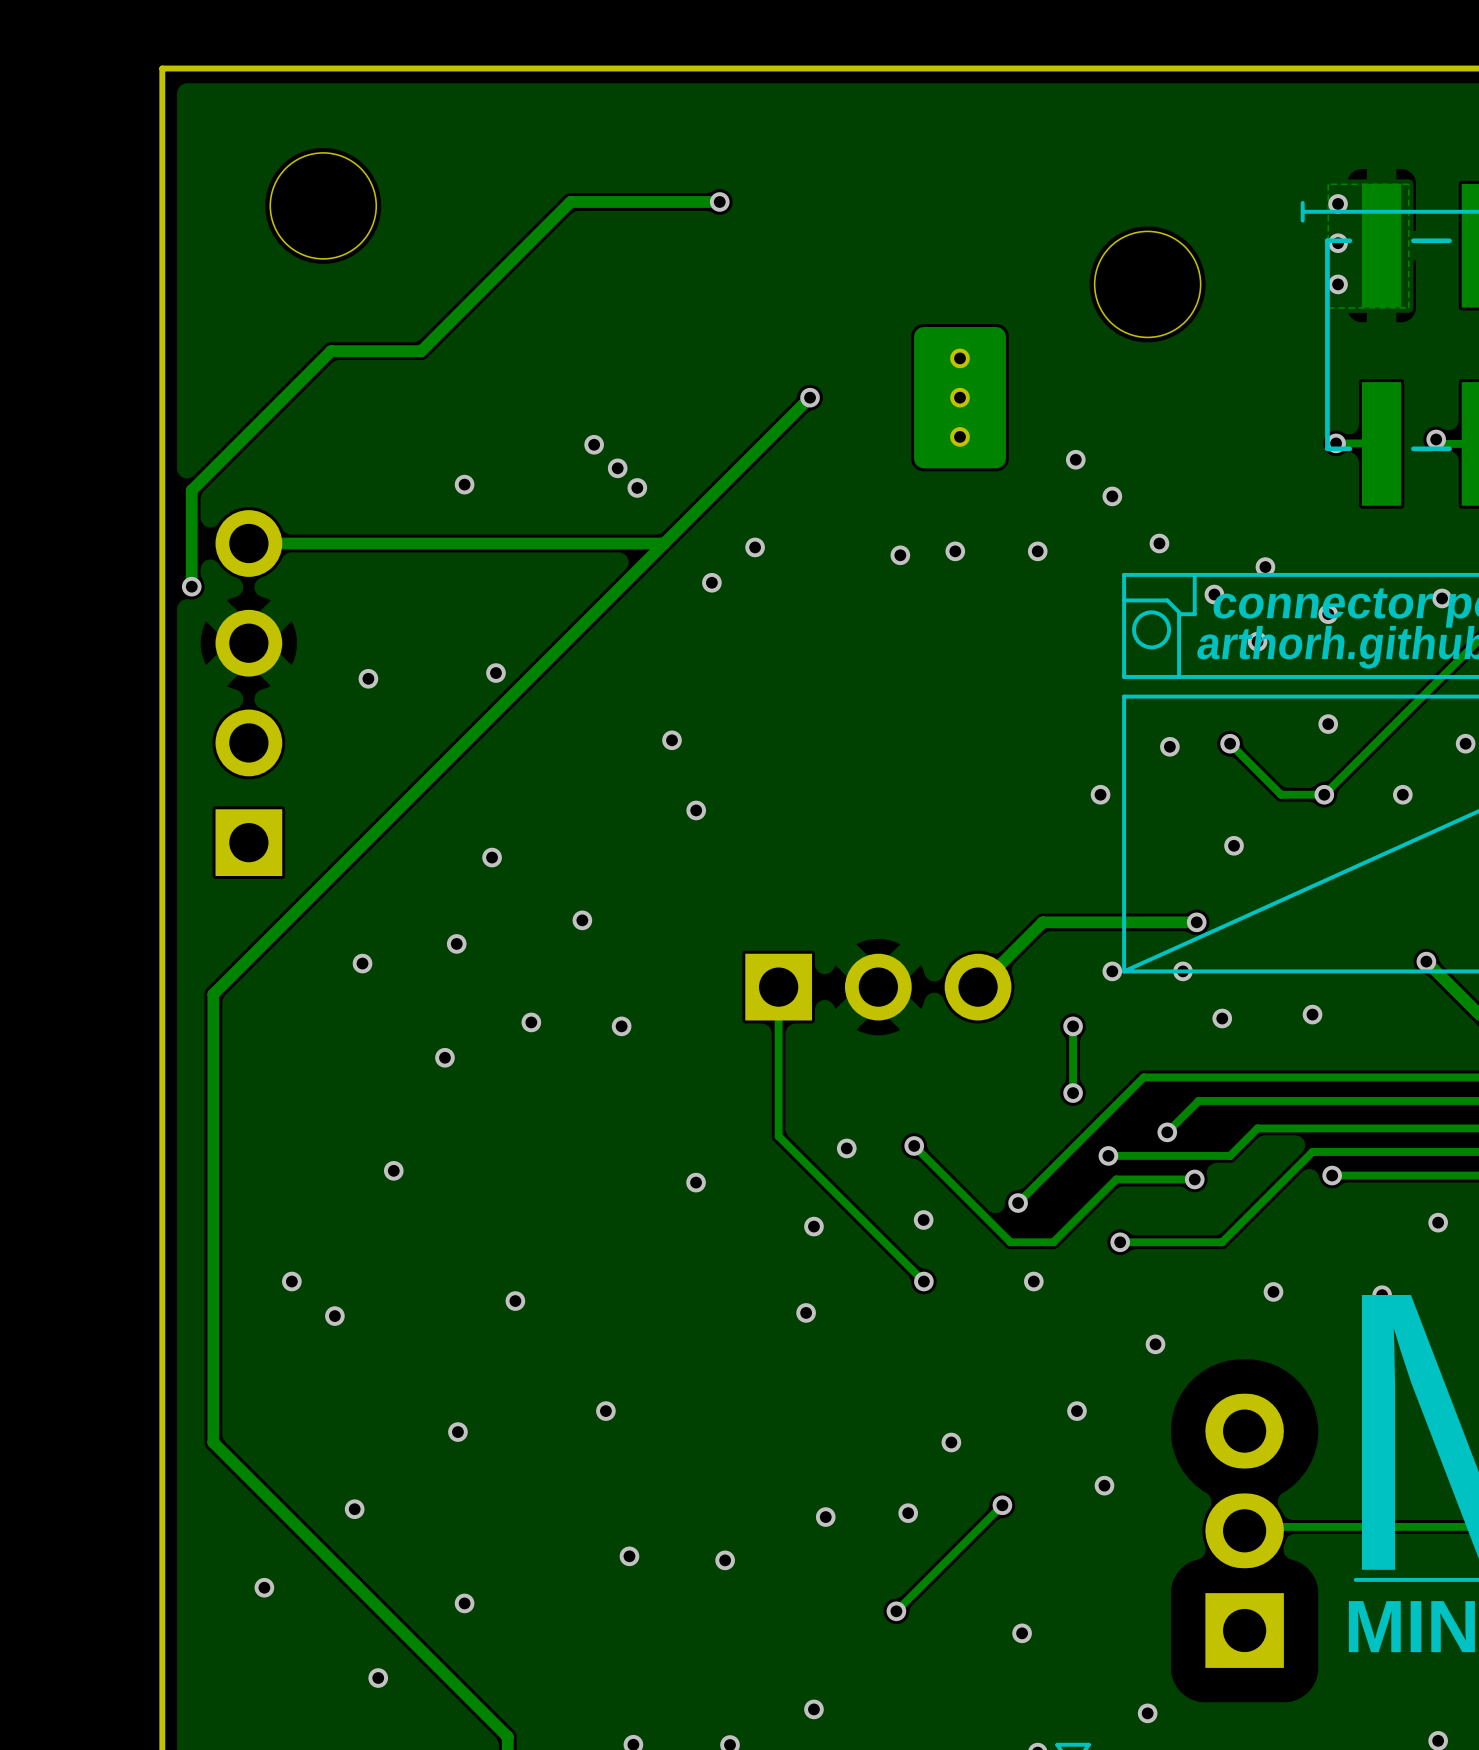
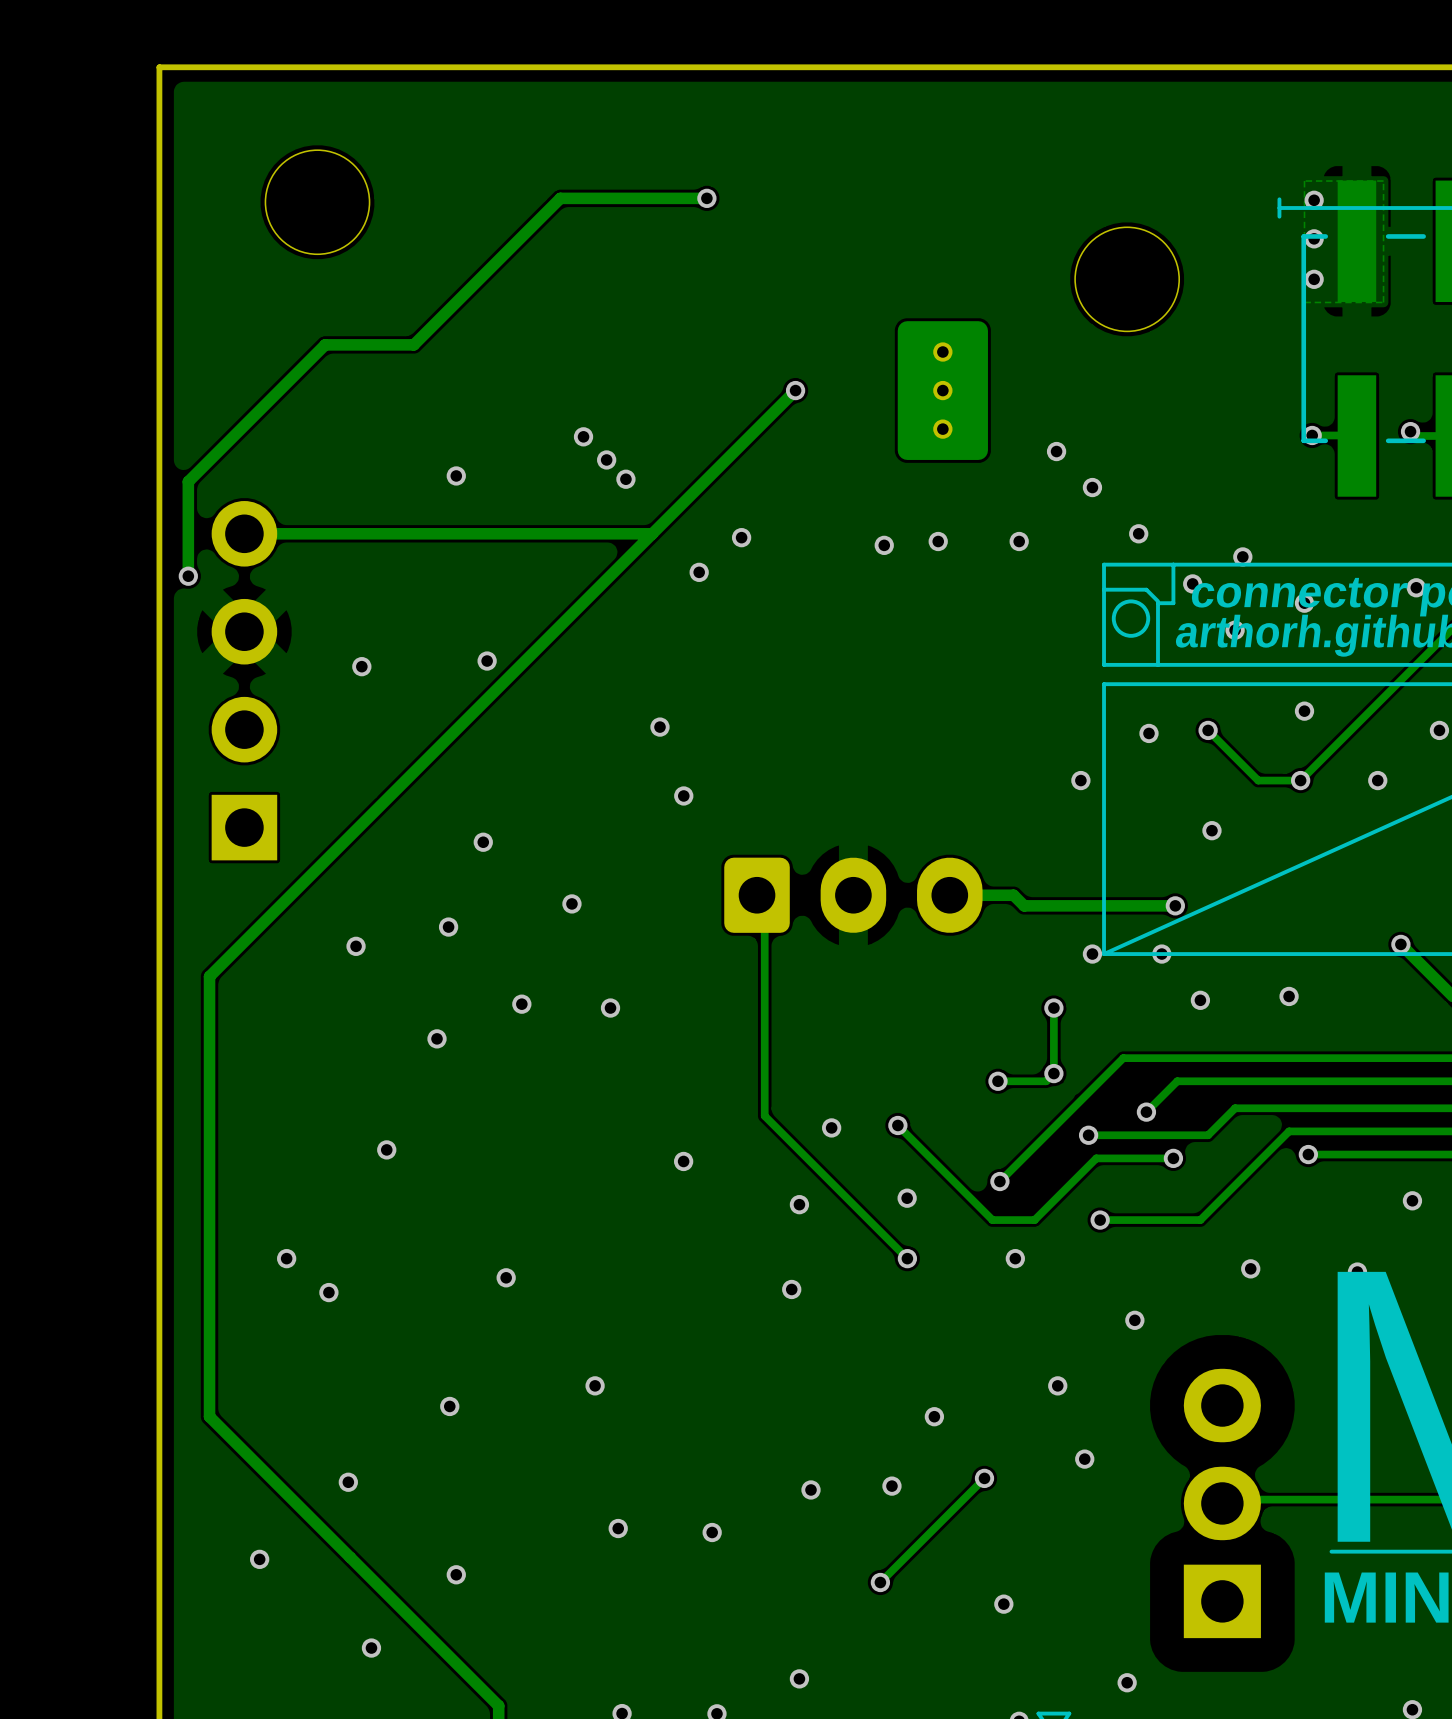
part: none -> (853, 895)
track: none -> (766, 902) (764, 903) (764, 969)
track: (1042, 922) (978, 987) -> (1024, 905) (1013, 895) (949, 895)
part: (878, 987) -> none
track: none -> (1053, 1073) (1046, 1081) (997, 1081)
via: none -> (997, 1081)

